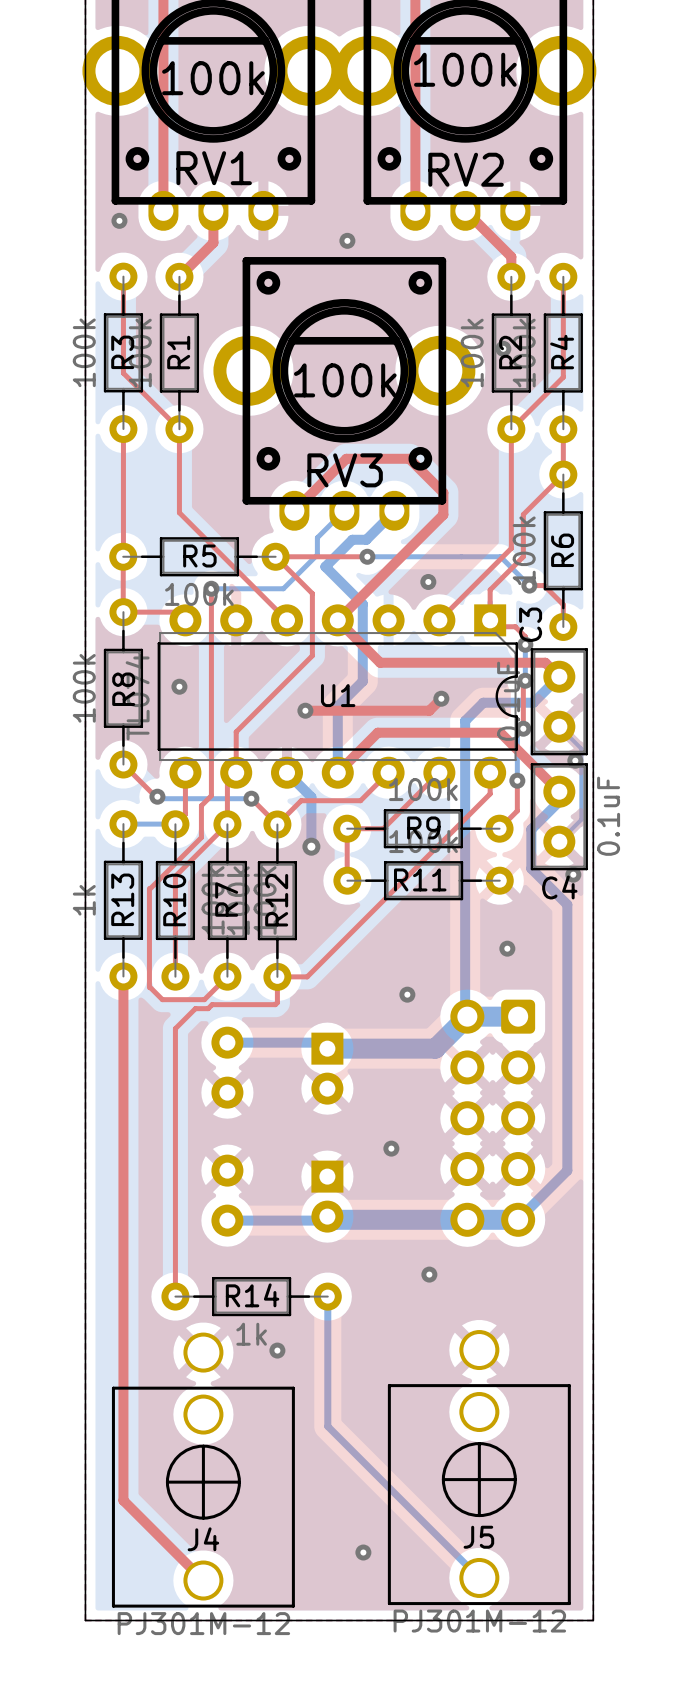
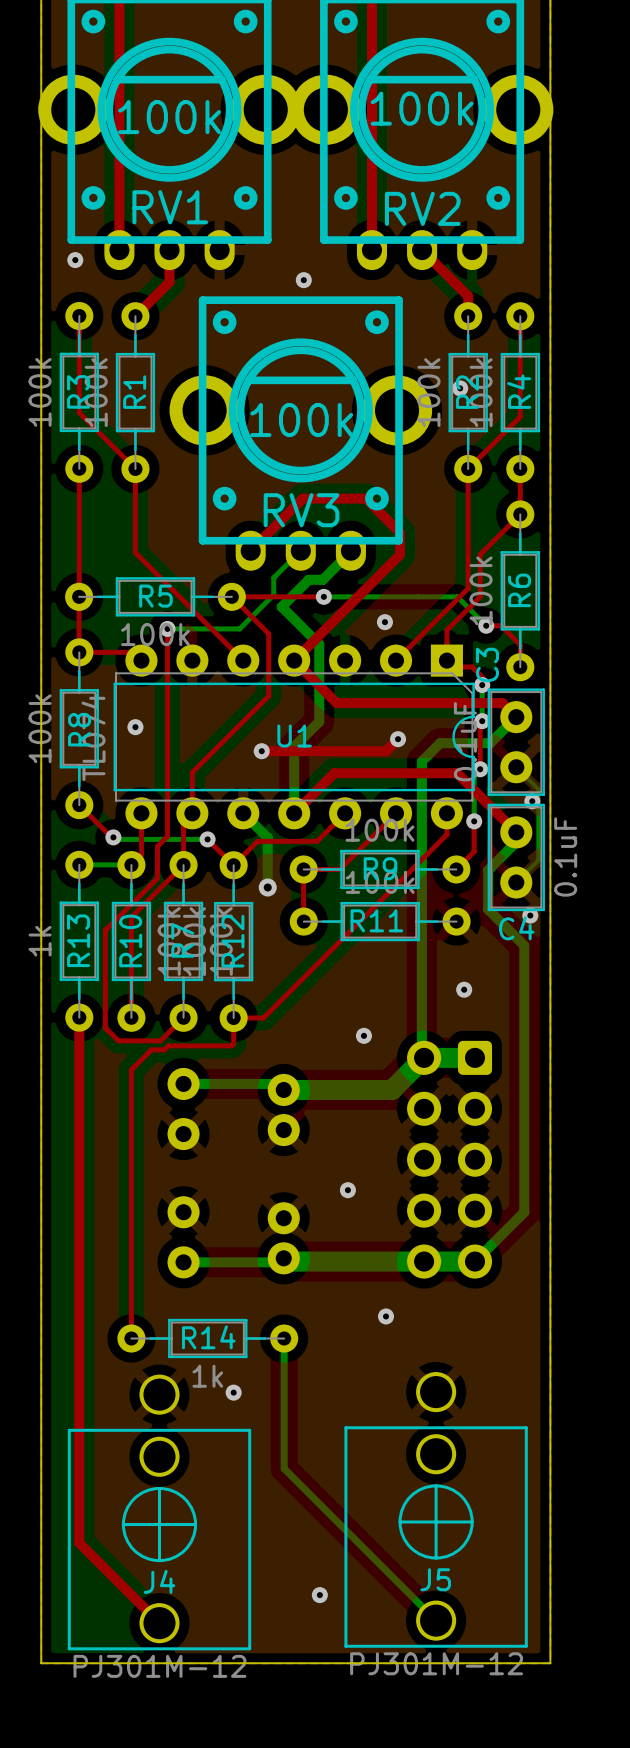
part footprint: [311, 1032, 344, 1105] -> [267, 1073, 300, 1147]
part footprint: [311, 1160, 344, 1233] -> [267, 1202, 300, 1275]

